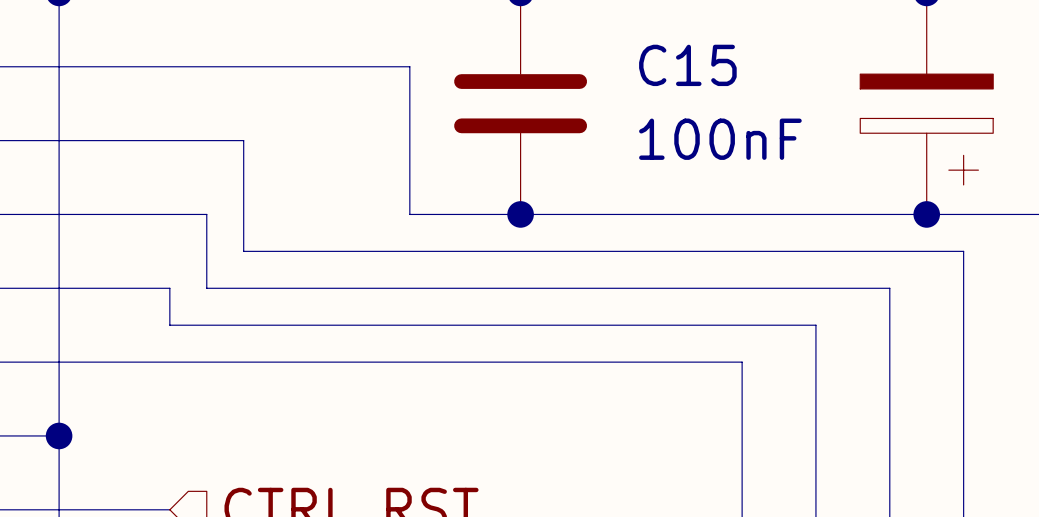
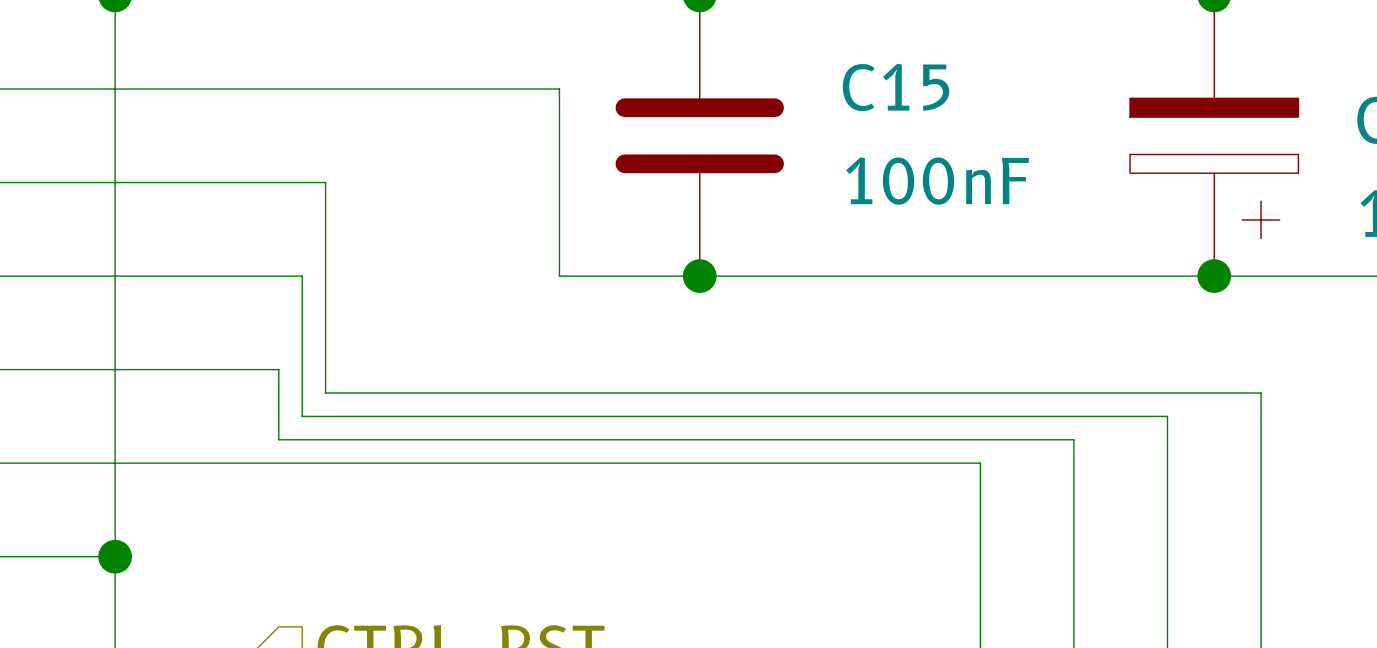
wire: (225, 140) (243, 140) (243, 251) (963, 251) (963, 306) -> (325, 182) (325, 393) (1261, 393)
wire: (169, 288) (169, 325) (206, 325) -> (302, 369) (302, 416)
wire: none -> (255, 369) (278, 369) (278, 439) (1073, 439)
wire: (206, 288) (889, 288) (889, 325) -> none
wire: (815, 325) (815, 343) -> (1073, 416) (1167, 416)

